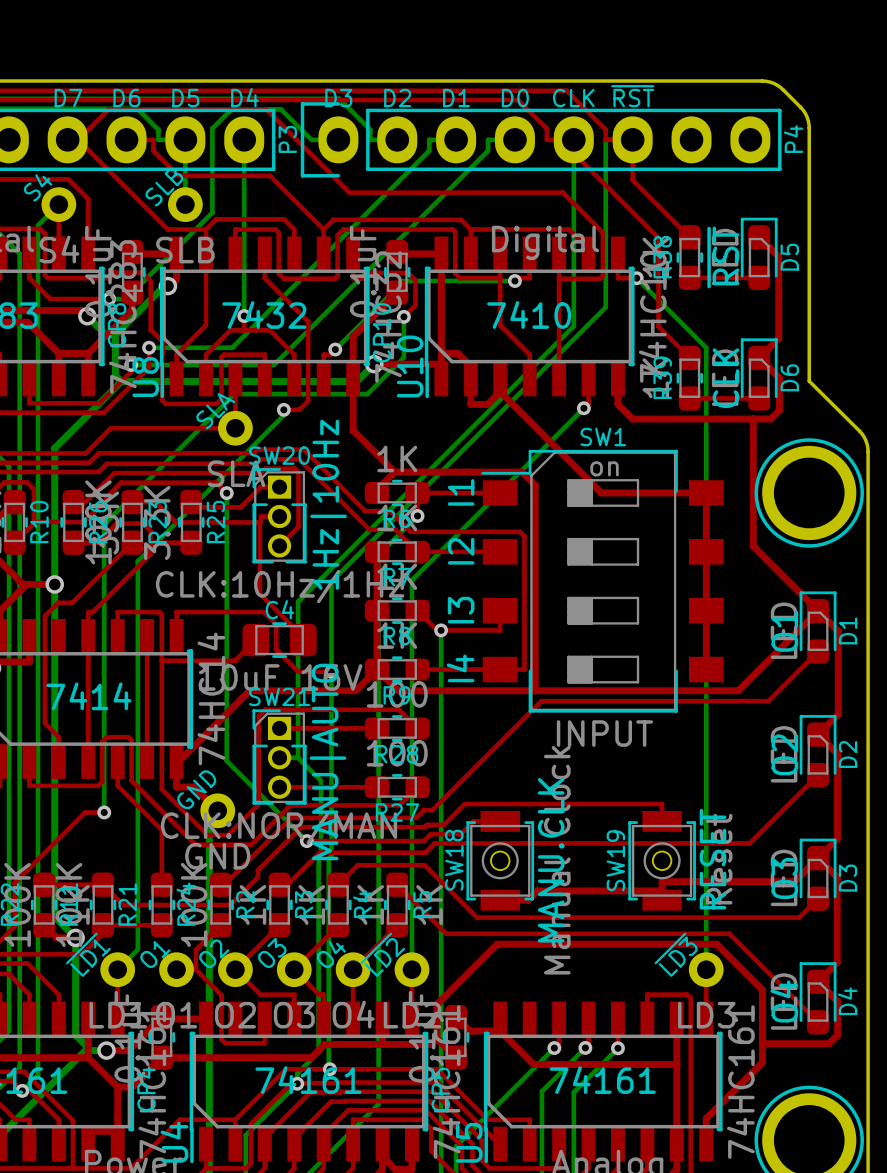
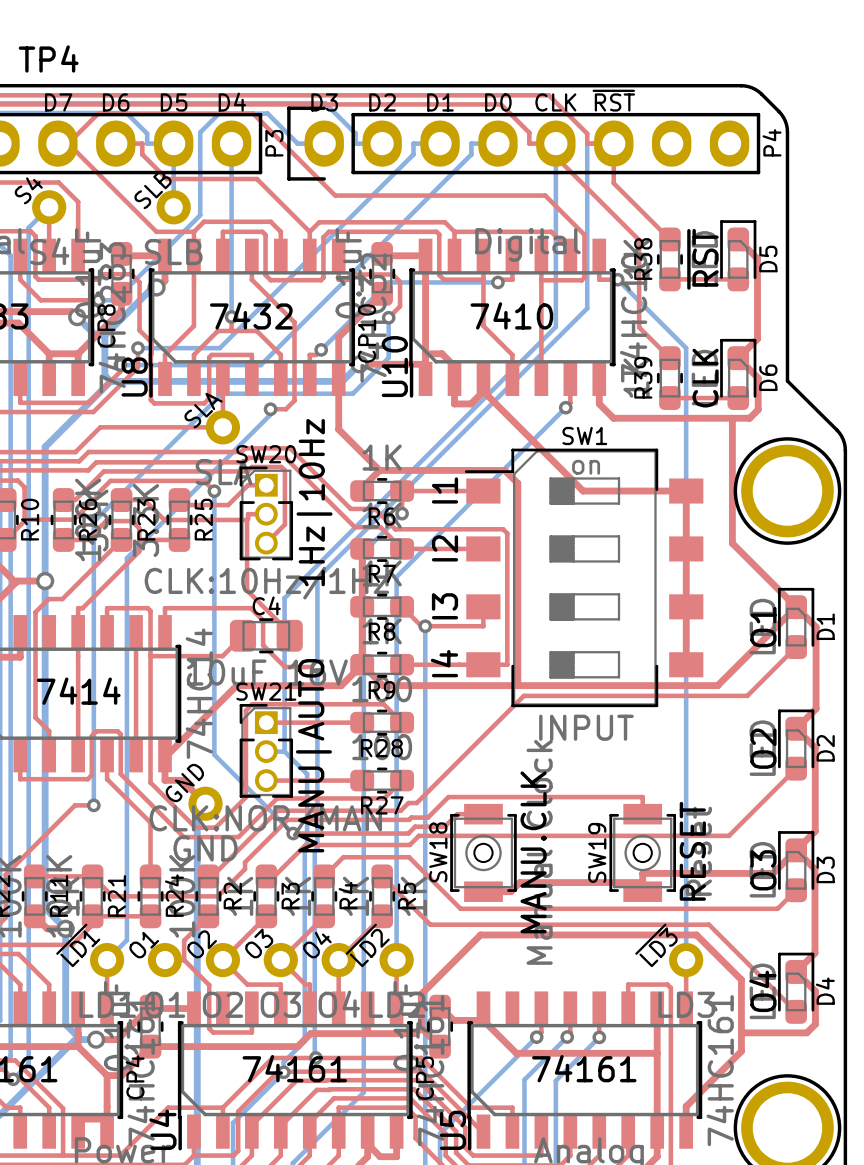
TP4 name: none -> TP4 (48, 58)

